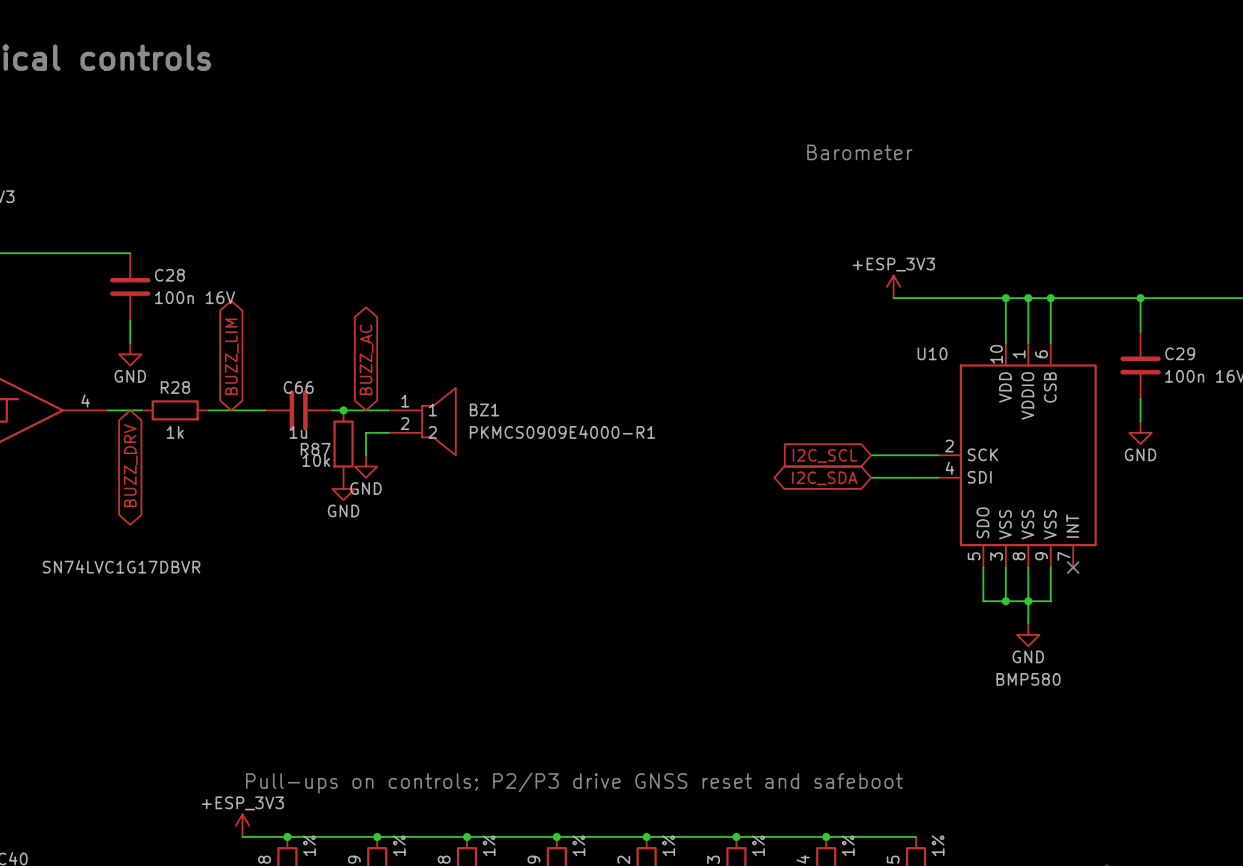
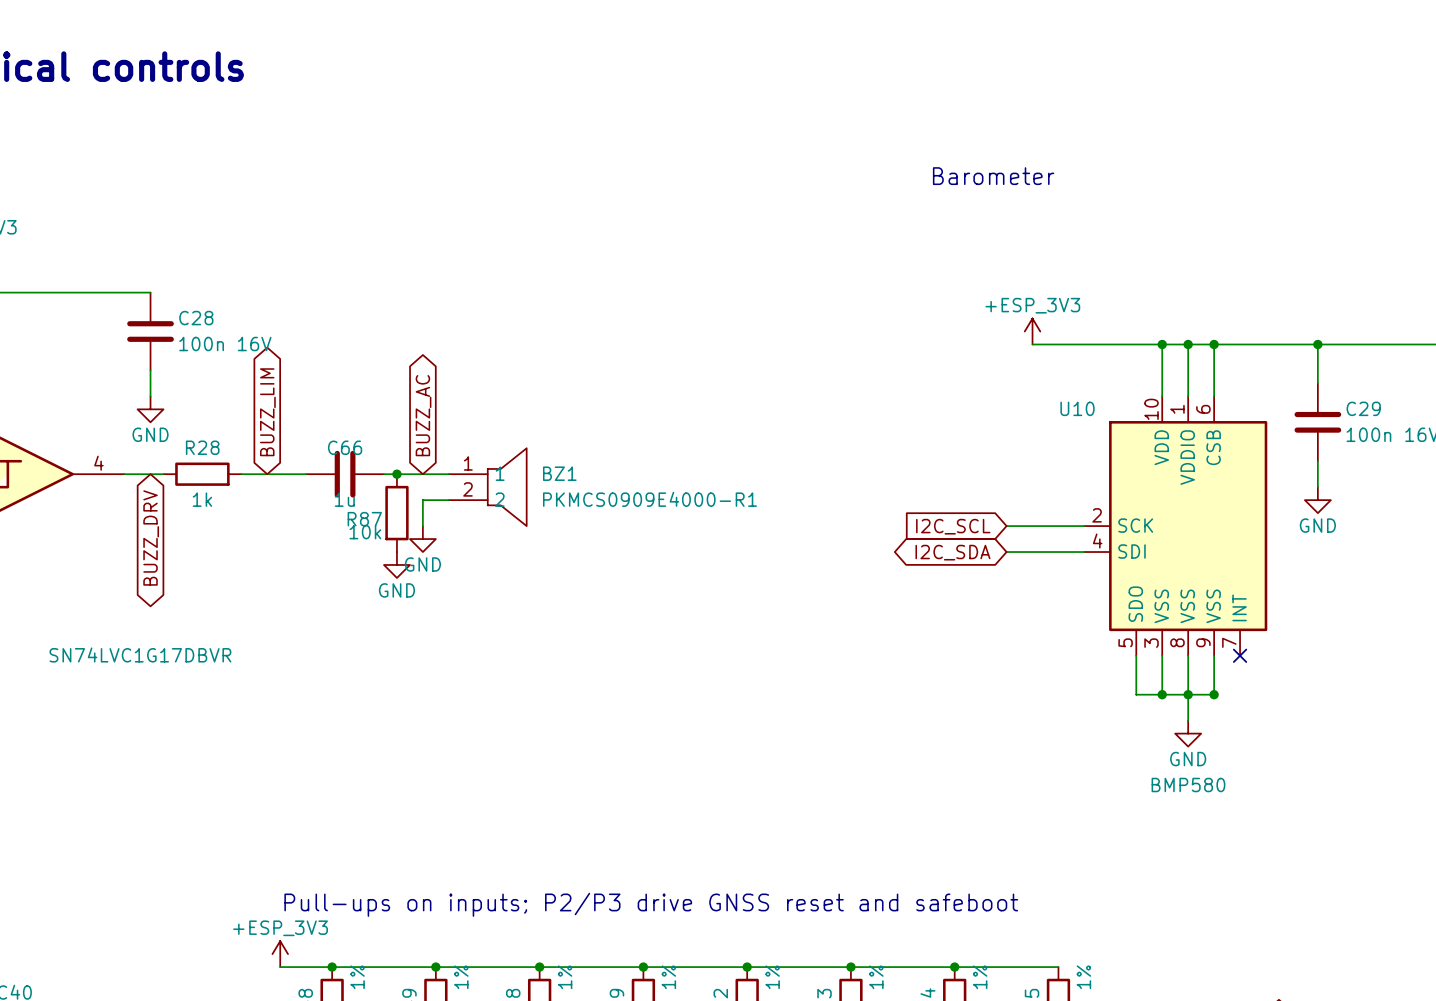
junction: none -> (1214, 694)
text: Pull-ups on controls; P2/P3 drive GNSS reset and safeboot (574, 783) -> Pull-ups on inputs; P2/P3 drive GNSS reset and safeboot (651, 904)

